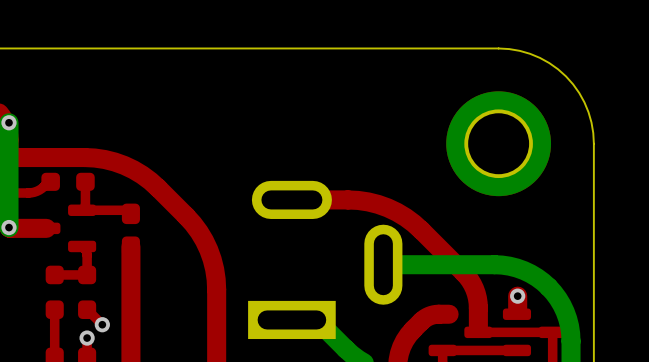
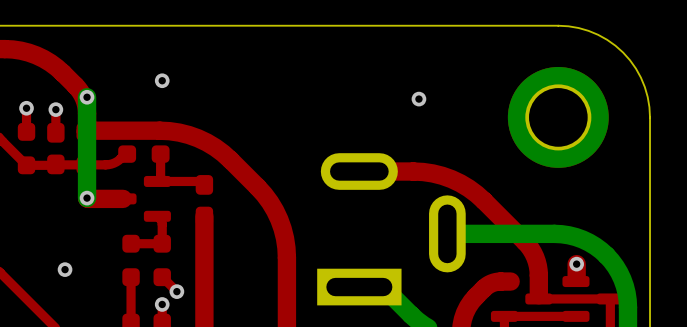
via: none -> (162, 80)
via: none -> (418, 99)

